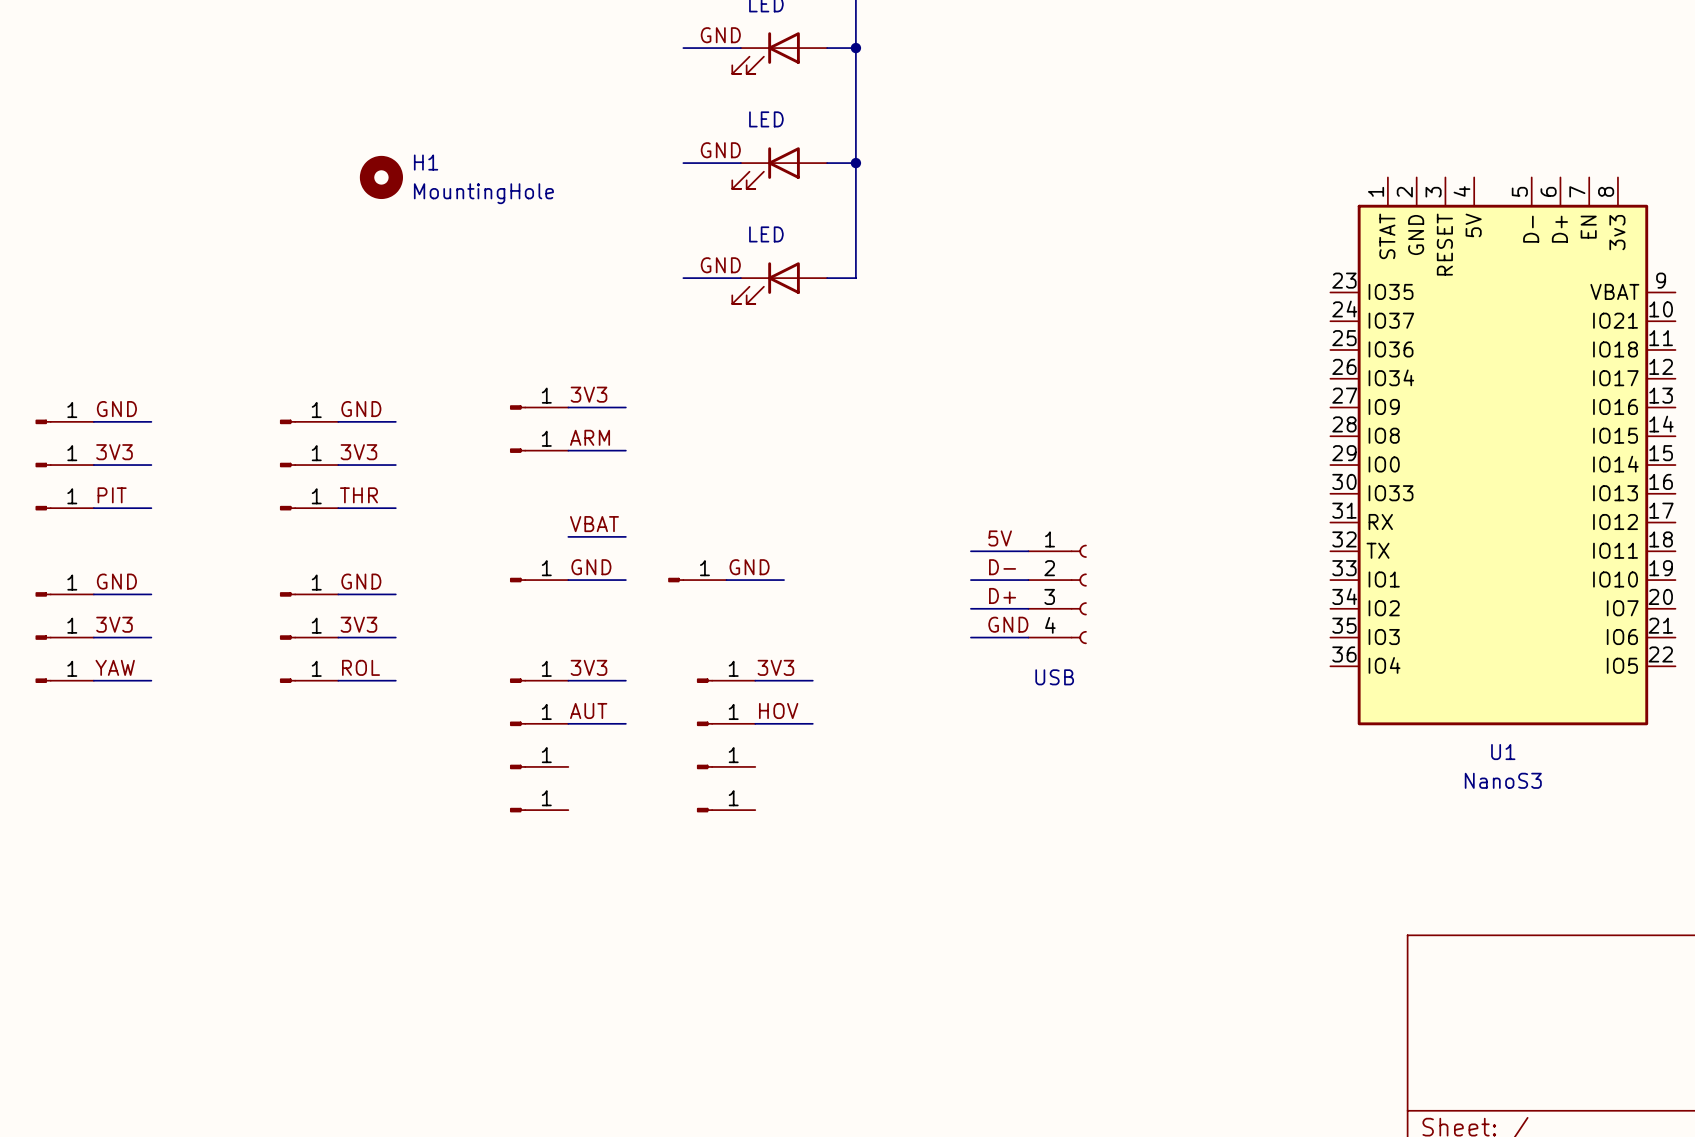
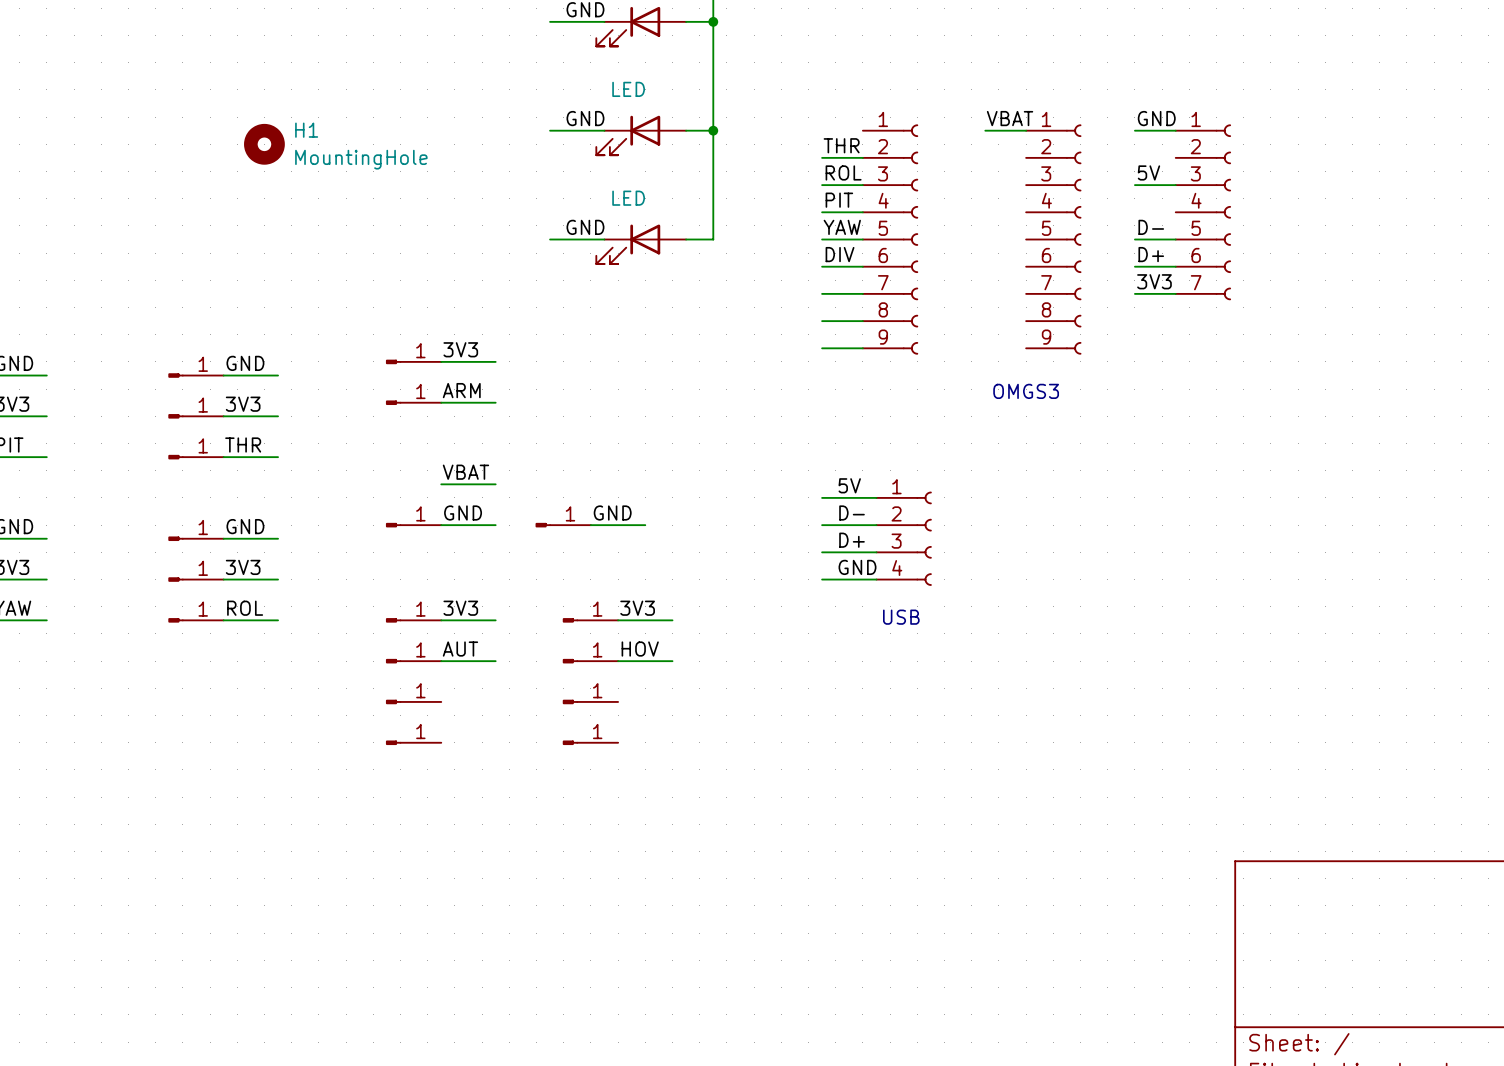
label: none -> VBAT (1010, 118)
label: none -> GND (1156, 118)
wire: none -> (985, 130) (1026, 130)
wire: none -> (1134, 130) (1175, 130)
label: none -> THR (841, 145)
wire: none -> (822, 157) (862, 157)
label: none -> ROL (843, 172)
label: none -> 5V (1148, 172)
wire: none -> (822, 185) (862, 185)
wire: none -> (1134, 185) (1175, 185)
label: none -> PIT (839, 200)
wire: none -> (822, 212) (862, 212)
part: none -> (1203, 212)
label: none -> YAW (842, 227)
label: none -> D- (1151, 227)
wire: none -> (822, 239) (862, 239)
part: none -> (890, 239)
part: none -> (1053, 239)
wire: none -> (1134, 239) (1175, 239)
label: none -> DIV (840, 254)
label: none -> D+ (1151, 254)
wire: none -> (822, 266) (862, 266)
wire: none -> (1134, 266) (1175, 266)
label: none -> 3V3 (1154, 281)
wire: none -> (822, 293) (862, 293)
wire: none -> (1134, 293) (1175, 293)
wire: none -> (822, 321) (862, 321)
wire: none -> (822, 348) (862, 348)
text: none -> OMGS3 (1026, 391)
U1: NanoS3 (1502, 451) -> none

